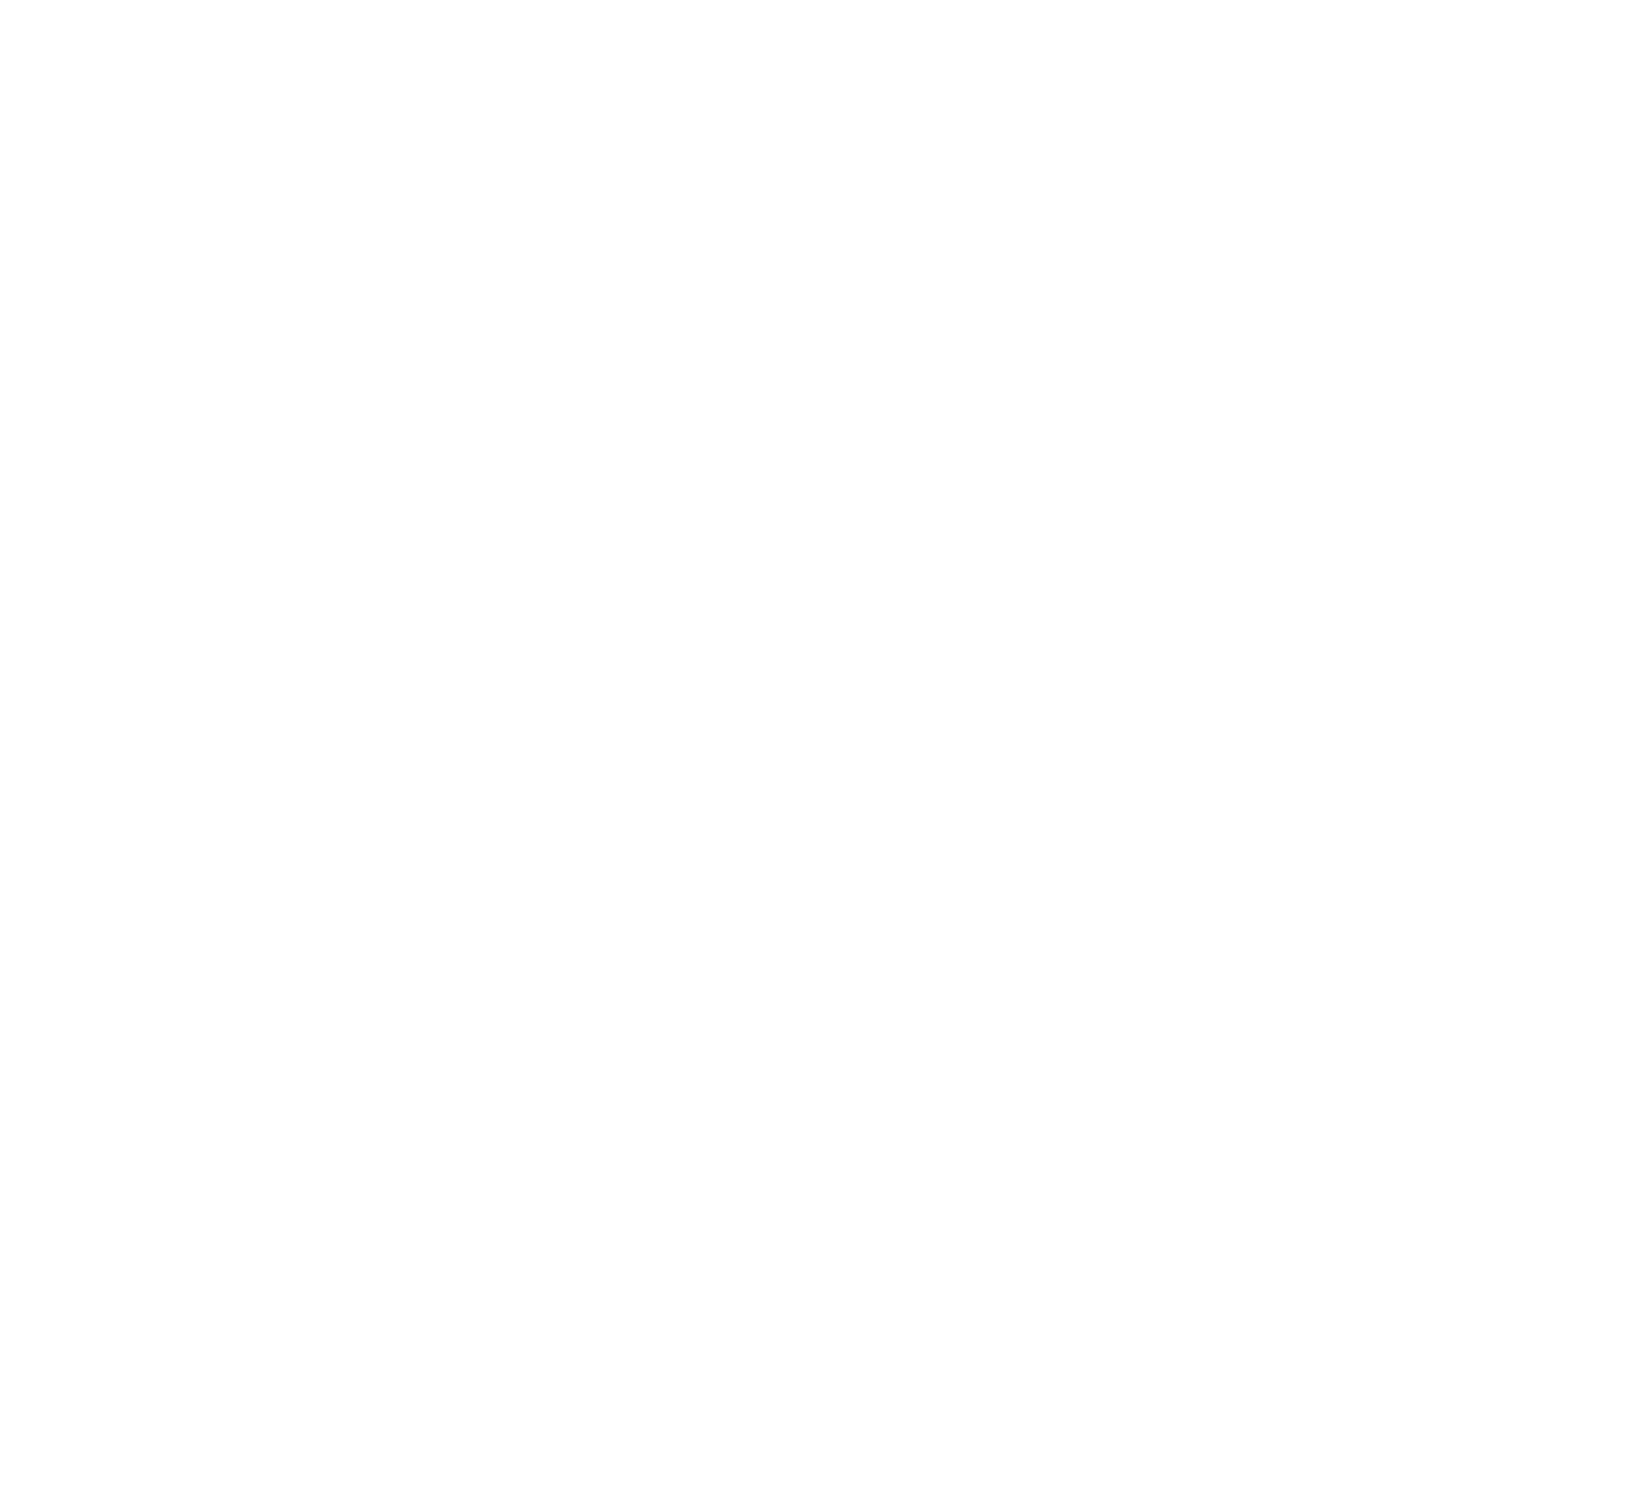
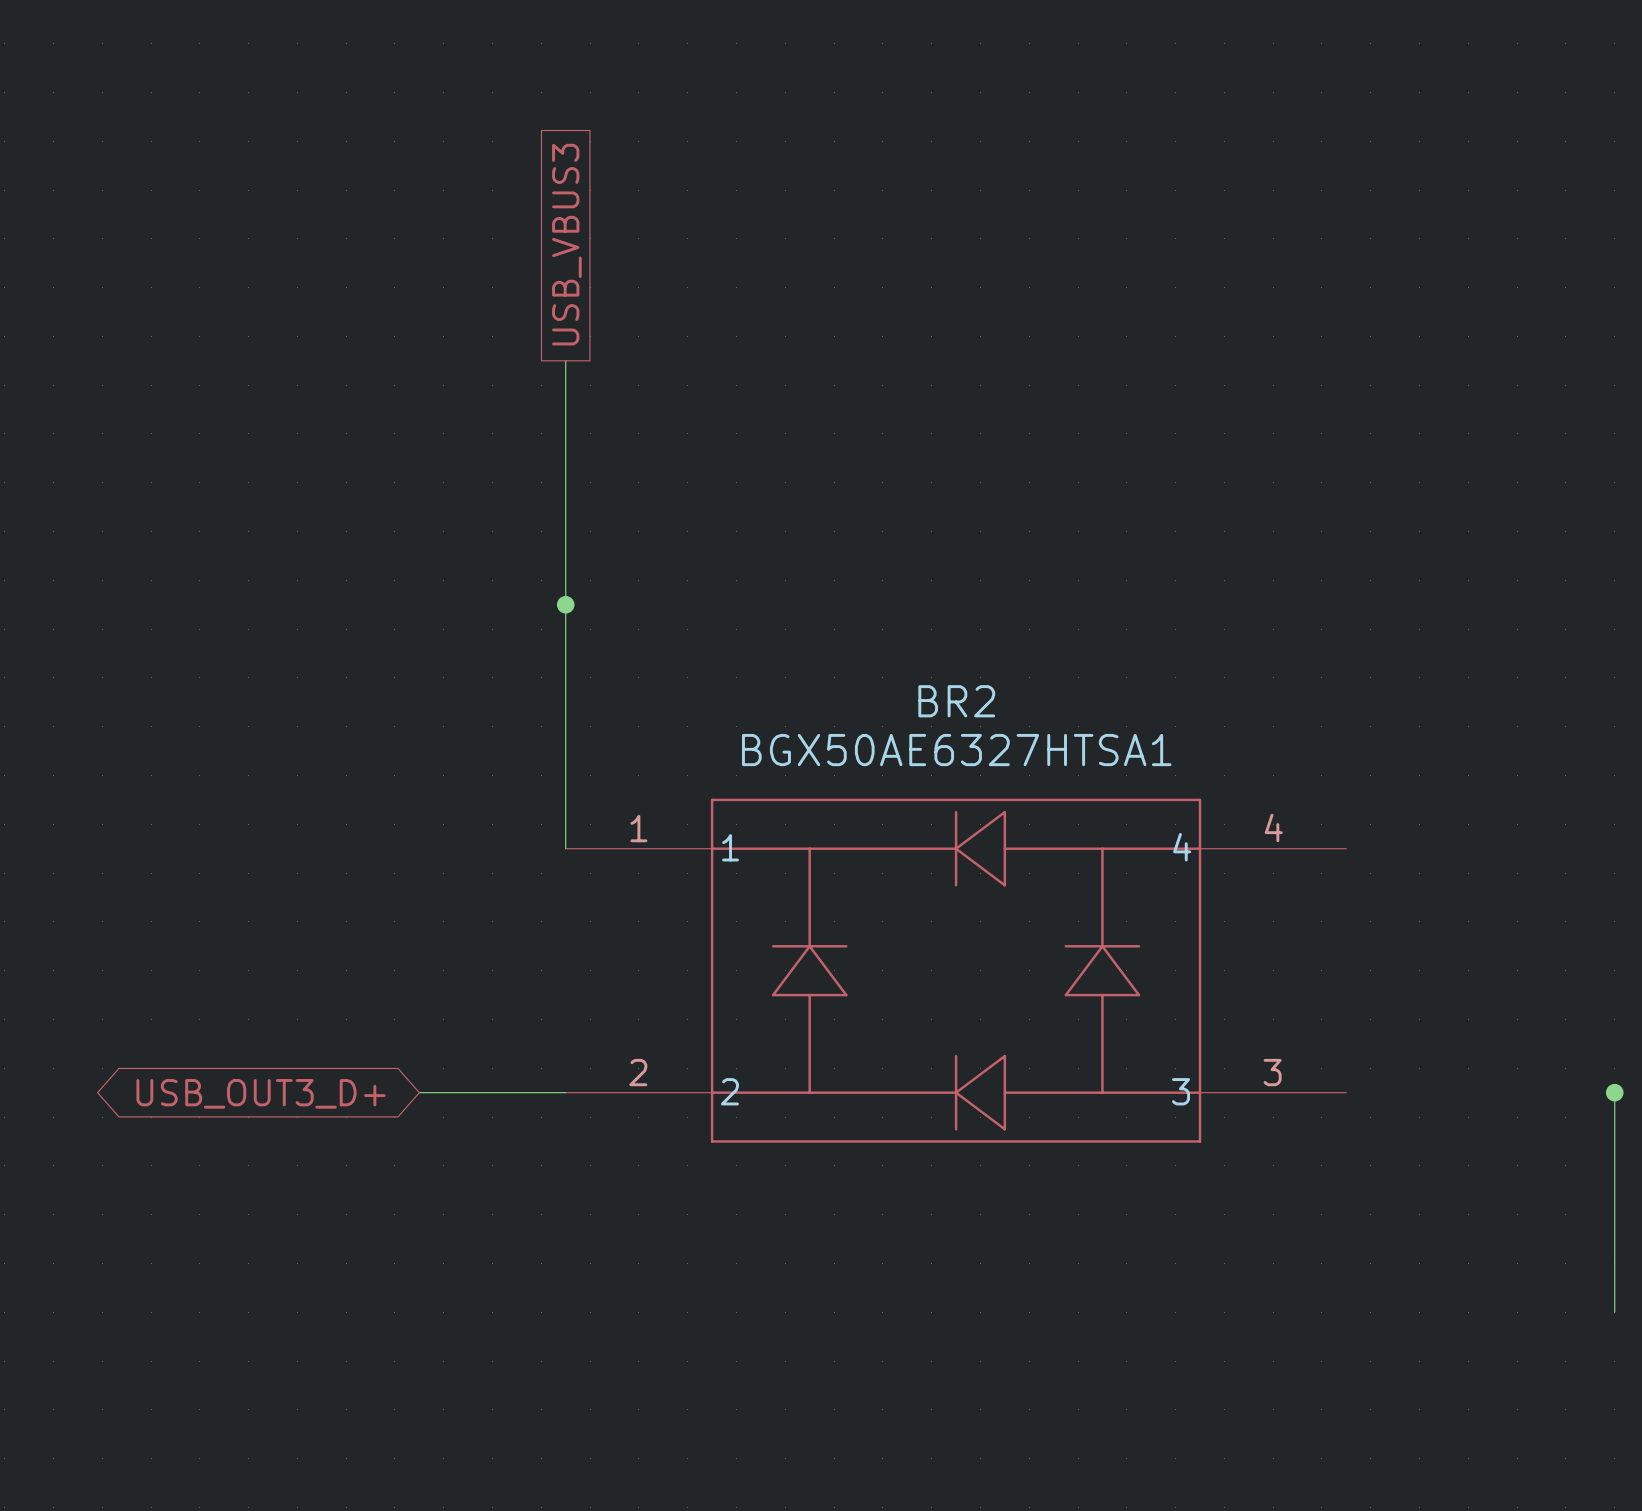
global label: none -> USB_VBUS3 (566, 244)
wire: none -> (565, 360) (565, 848)
junction: none -> (565, 604)
BR2: none -> BGX50AE6327HTSA1 (956, 970)
global label: none -> USB_OUT3_D+ (261, 1093)
wire: none -> (419, 1092) (565, 1092)
wire: none -> (1614, 1092) (1614, 1312)
junction: none -> (1614, 1092)

